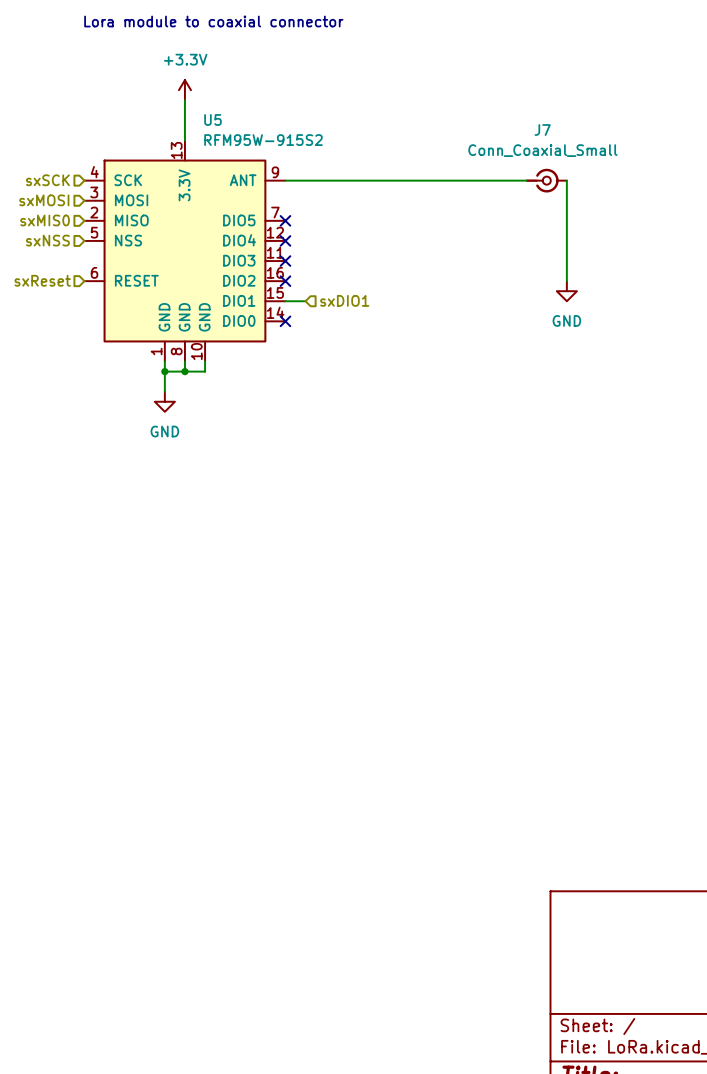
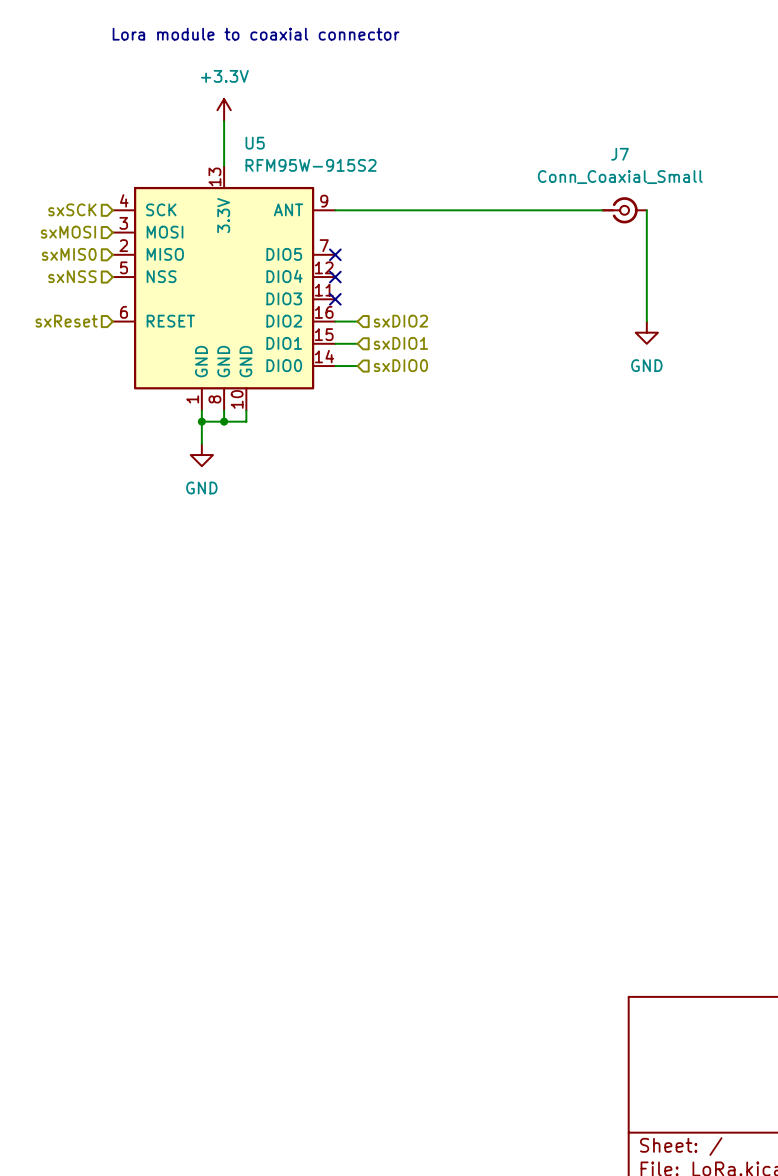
hierarchical label: none -> sxDIO2 (400, 321)
wire: none -> (335, 321) (357, 321)
no-connect mark: (285, 281) -> none
hierarchical label: none -> sxDIO0 (400, 365)
wire: none -> (335, 366) (357, 366)
no-connect mark: (285, 321) -> none

